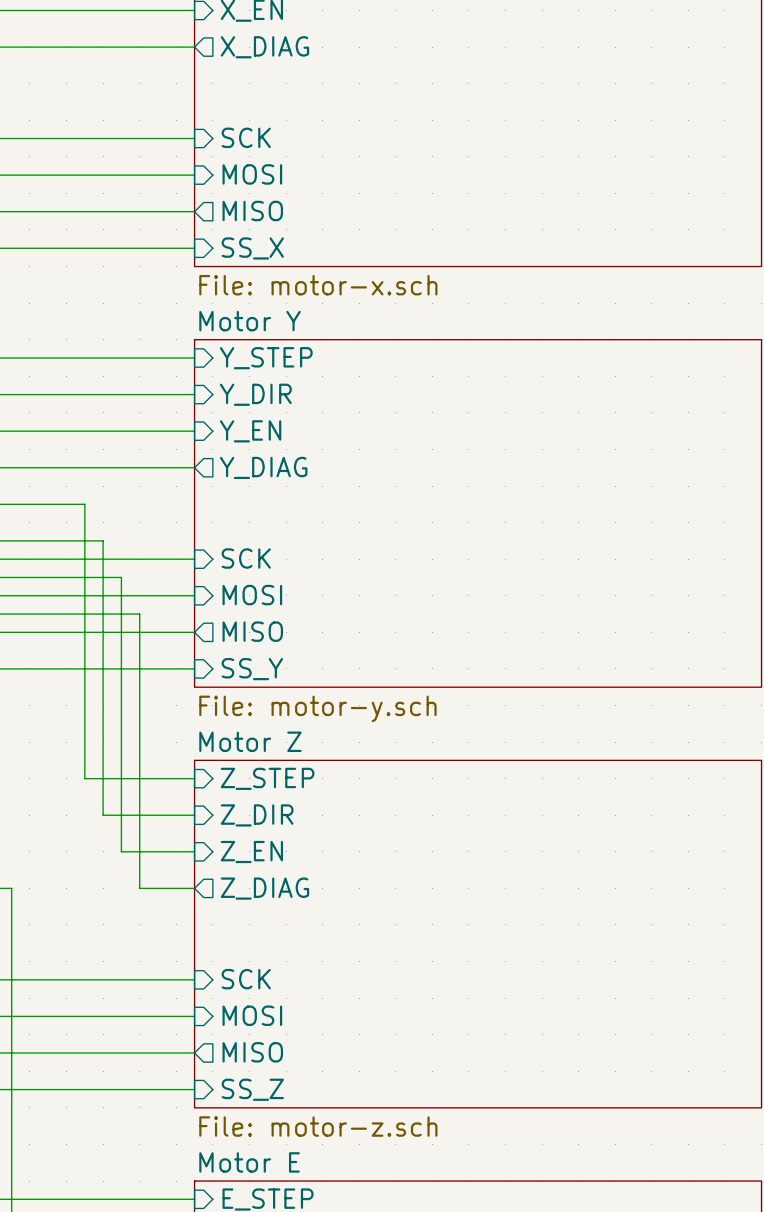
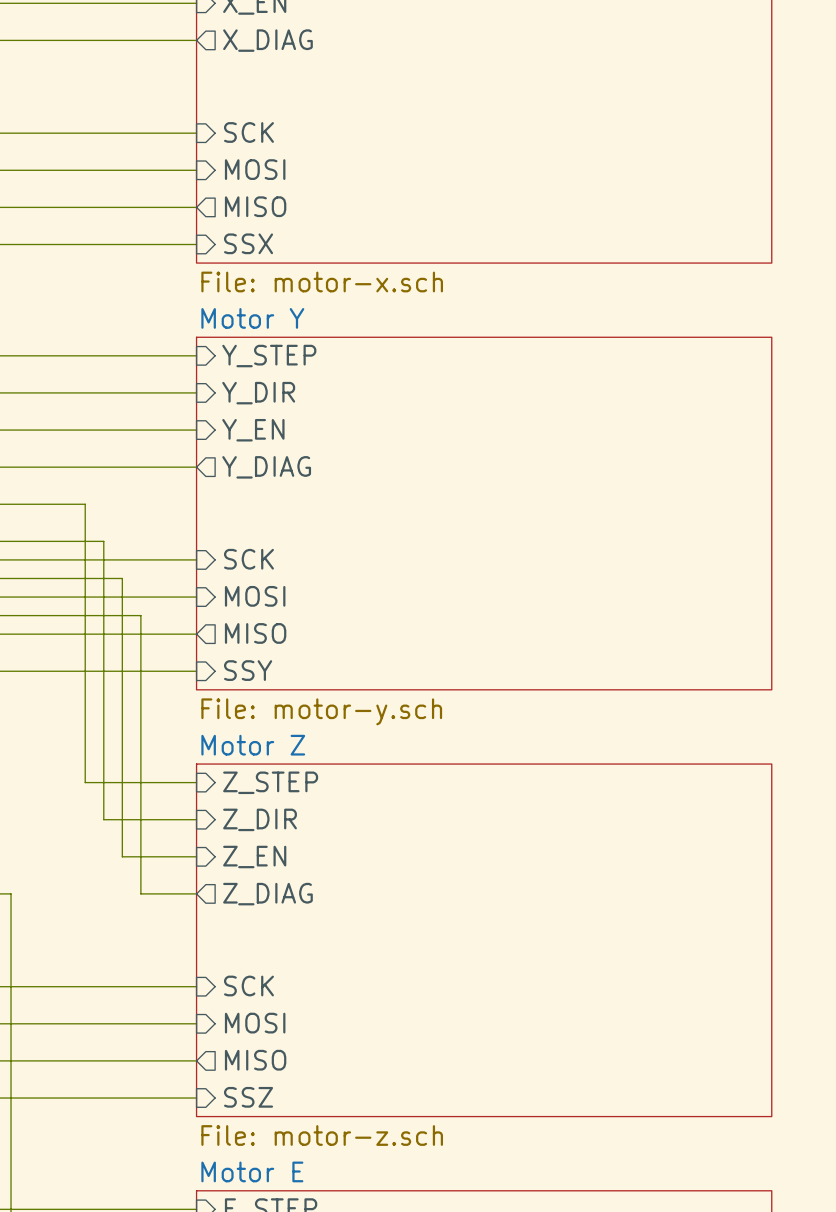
sheet pin: SS_X (252, 248) -> SSX (248, 243)
sheet pin: SS_Y (252, 669) -> SSY (248, 670)
sheet pin: SS_Z (252, 1089) -> SSZ (248, 1097)

